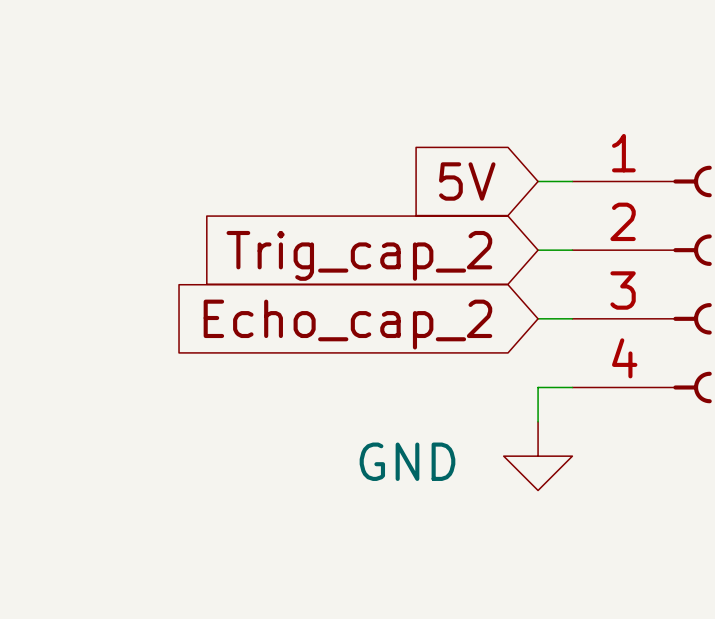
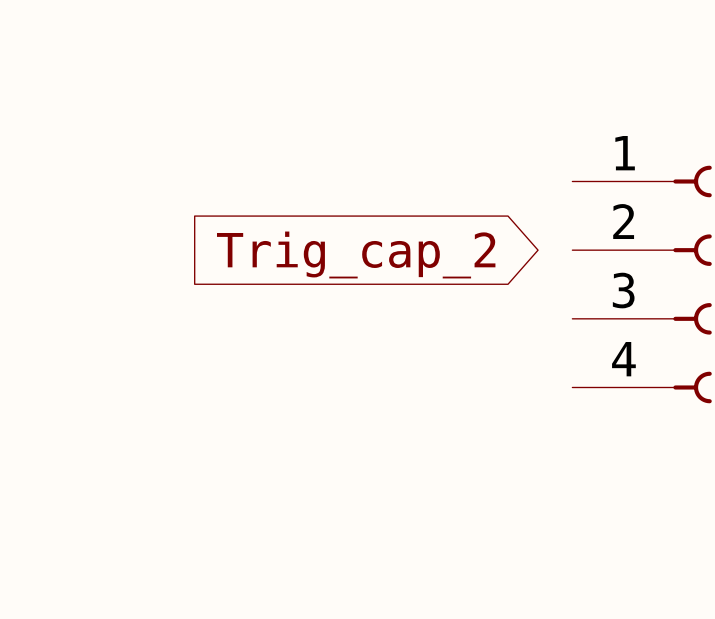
global label: 5V (467, 181) -> none
wire: (538, 181) (572, 181) -> none
wire: (538, 250) (572, 250) -> none
wire: (538, 318) (572, 318) -> none
global label: Echo_cap_2 (347, 324) -> none
wire: (572, 387) (538, 387) (538, 421) -> none
power symbol: GND (538, 456) -> none

